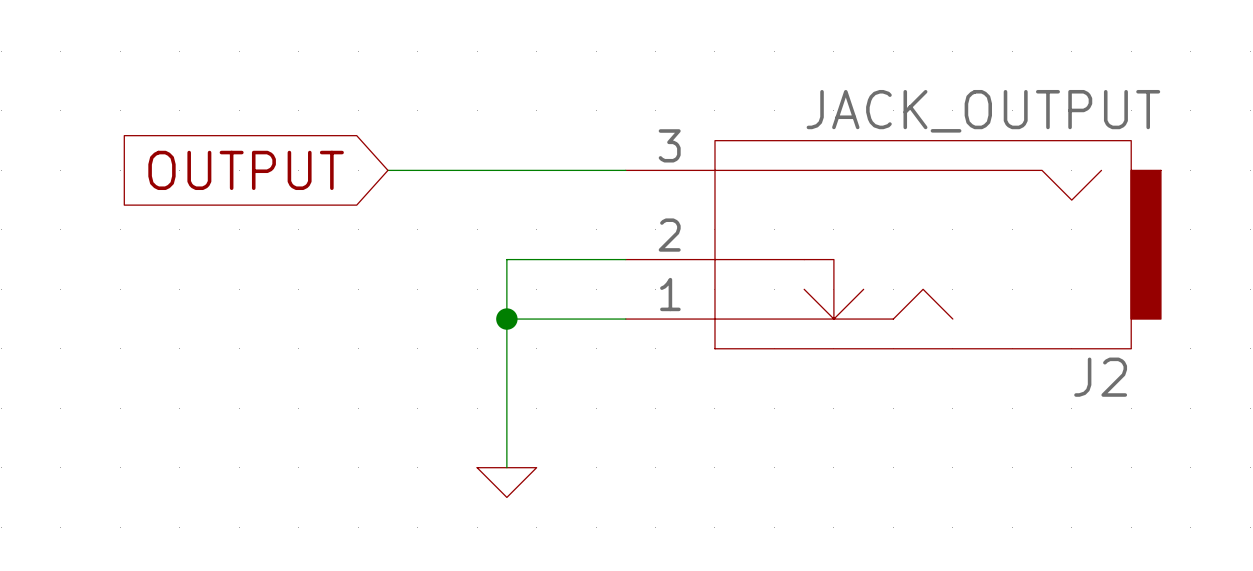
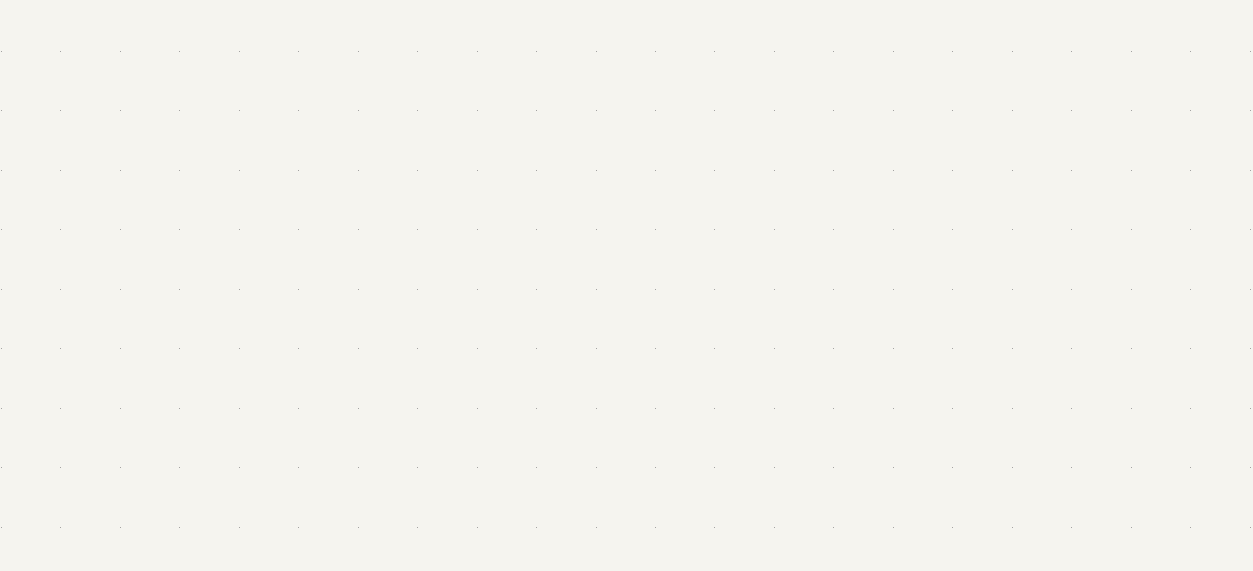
global label: OUTPUT (246, 170) -> none
wire: (387, 170) (625, 170) -> none
J2: JACK_OUTPUT (893, 244) -> none
wire: (625, 259) (506, 259) (506, 467) -> none
wire: (506, 319) (625, 319) -> none
junction: (506, 319) -> none
power symbol: (506, 482) -> none

